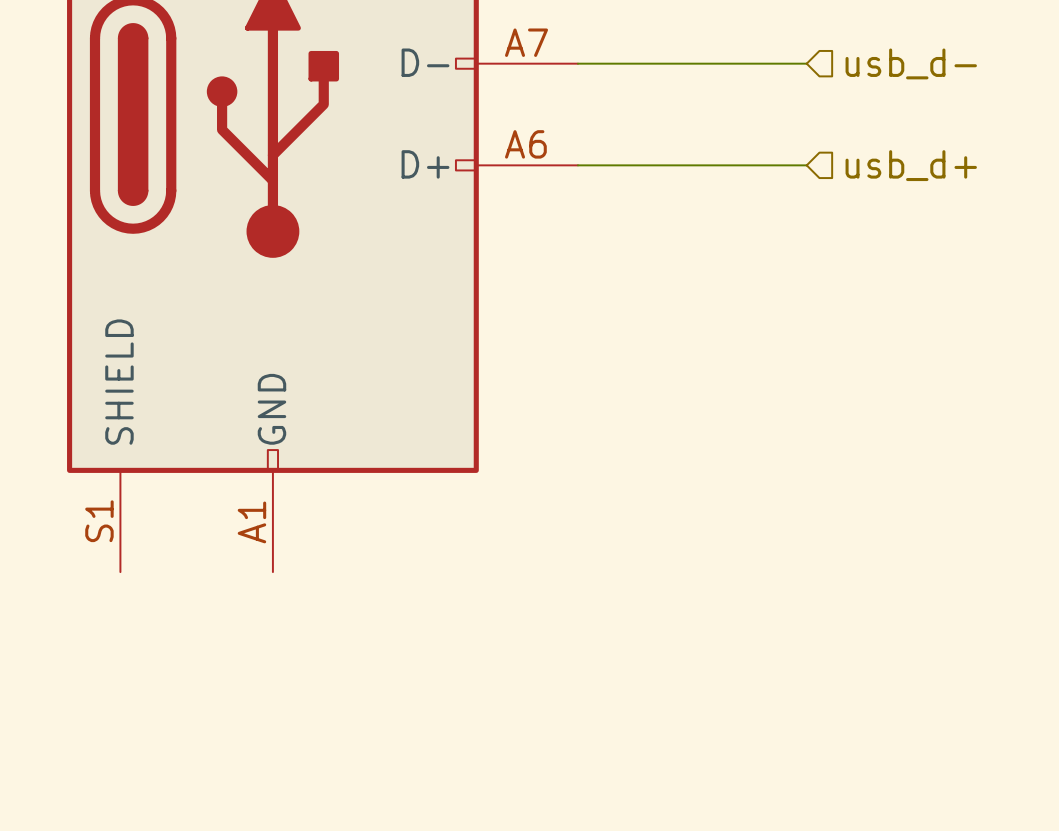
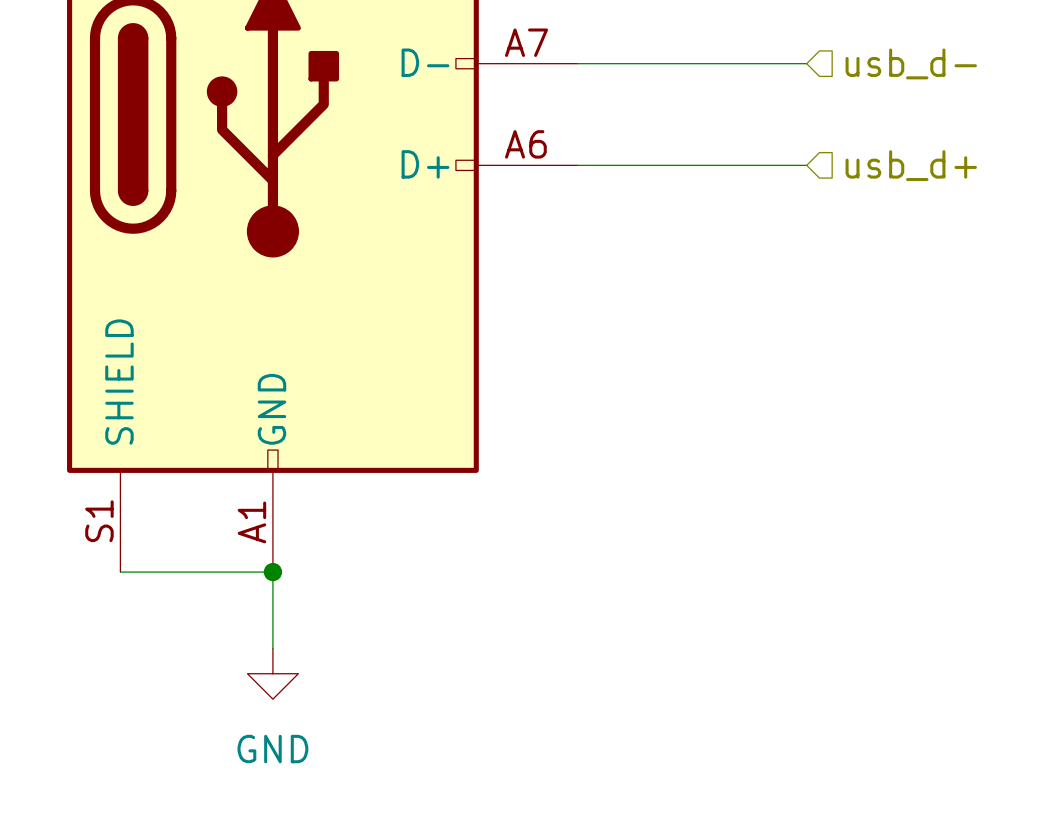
wire: none -> (120, 572) (272, 572) (272, 648)
junction: none -> (272, 572)
power symbol: none -> GND (272, 673)

